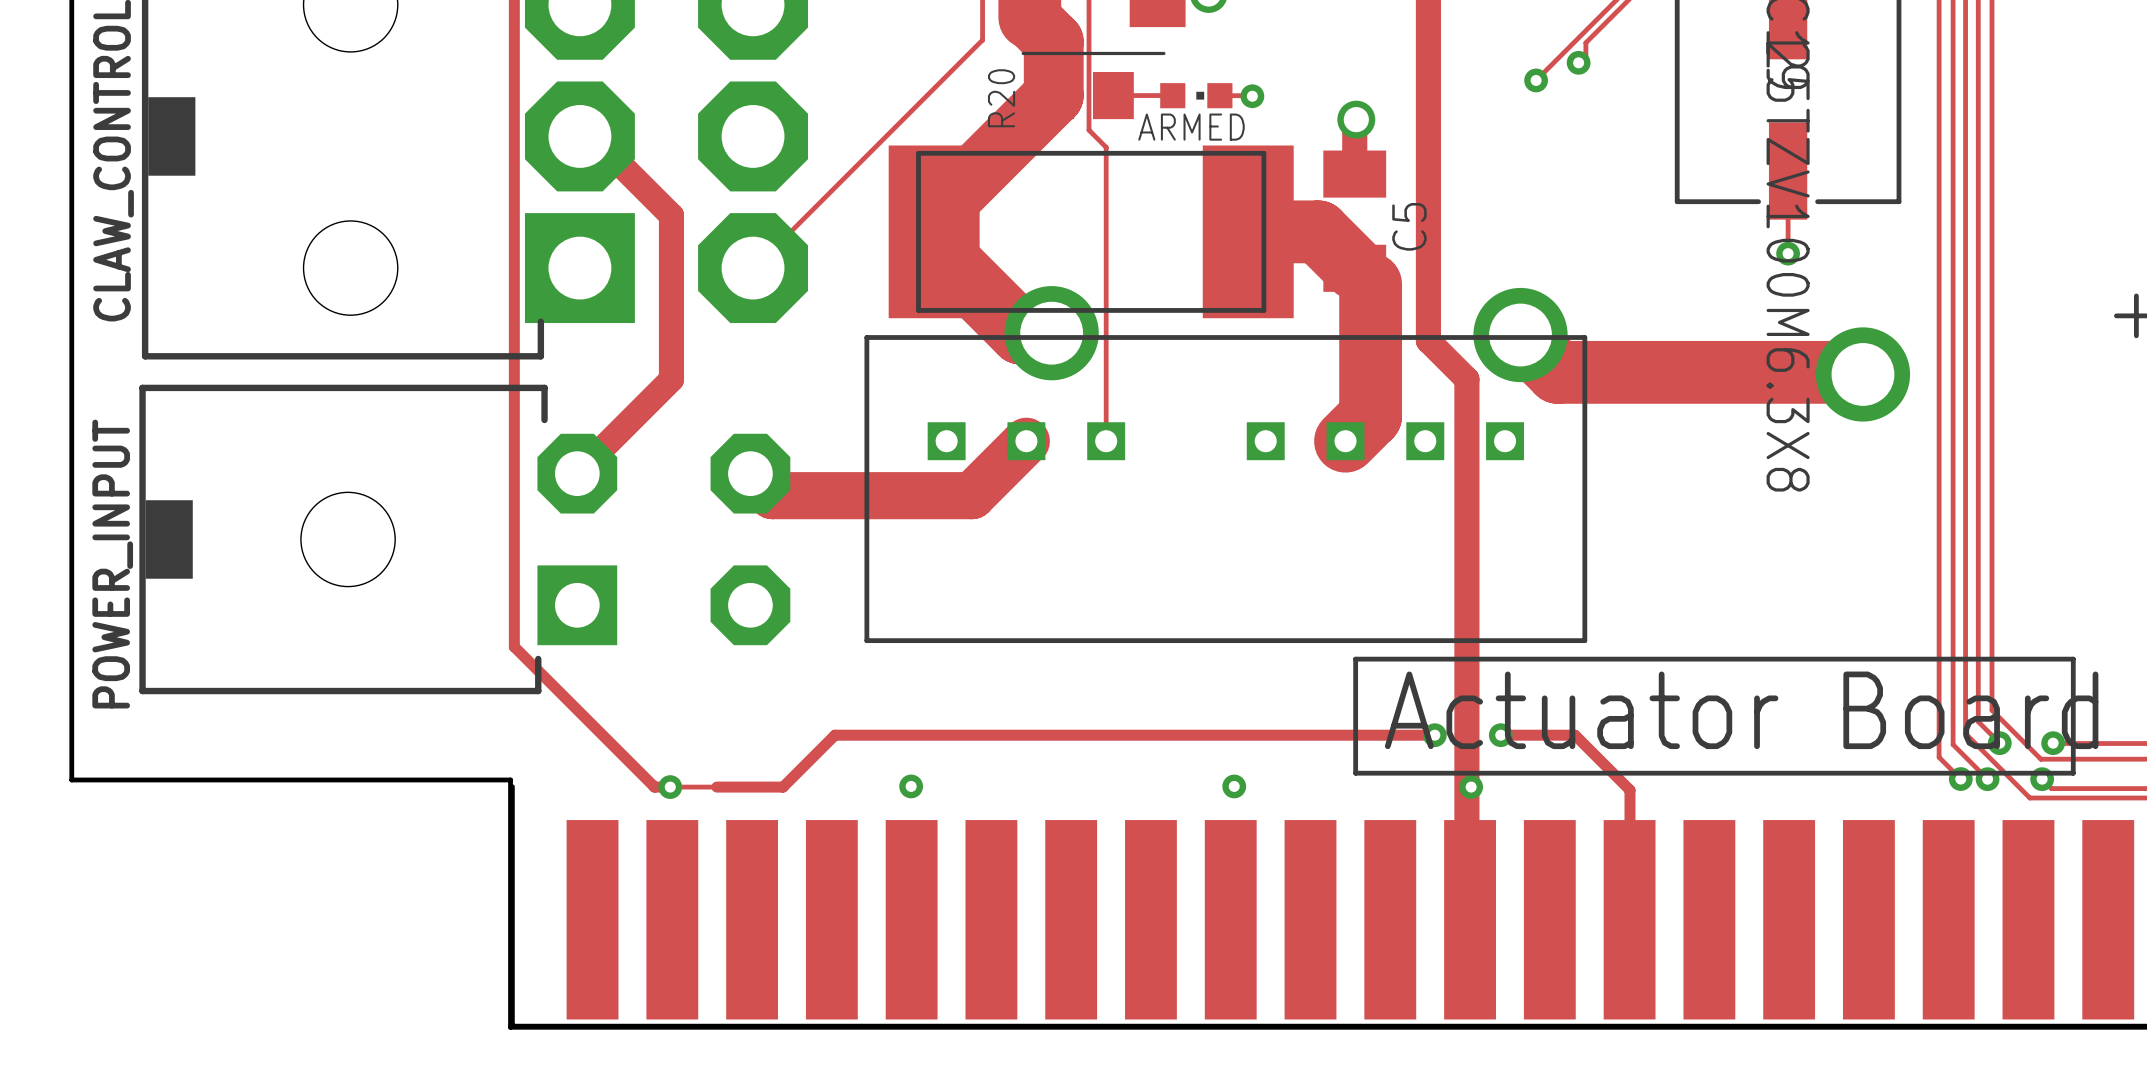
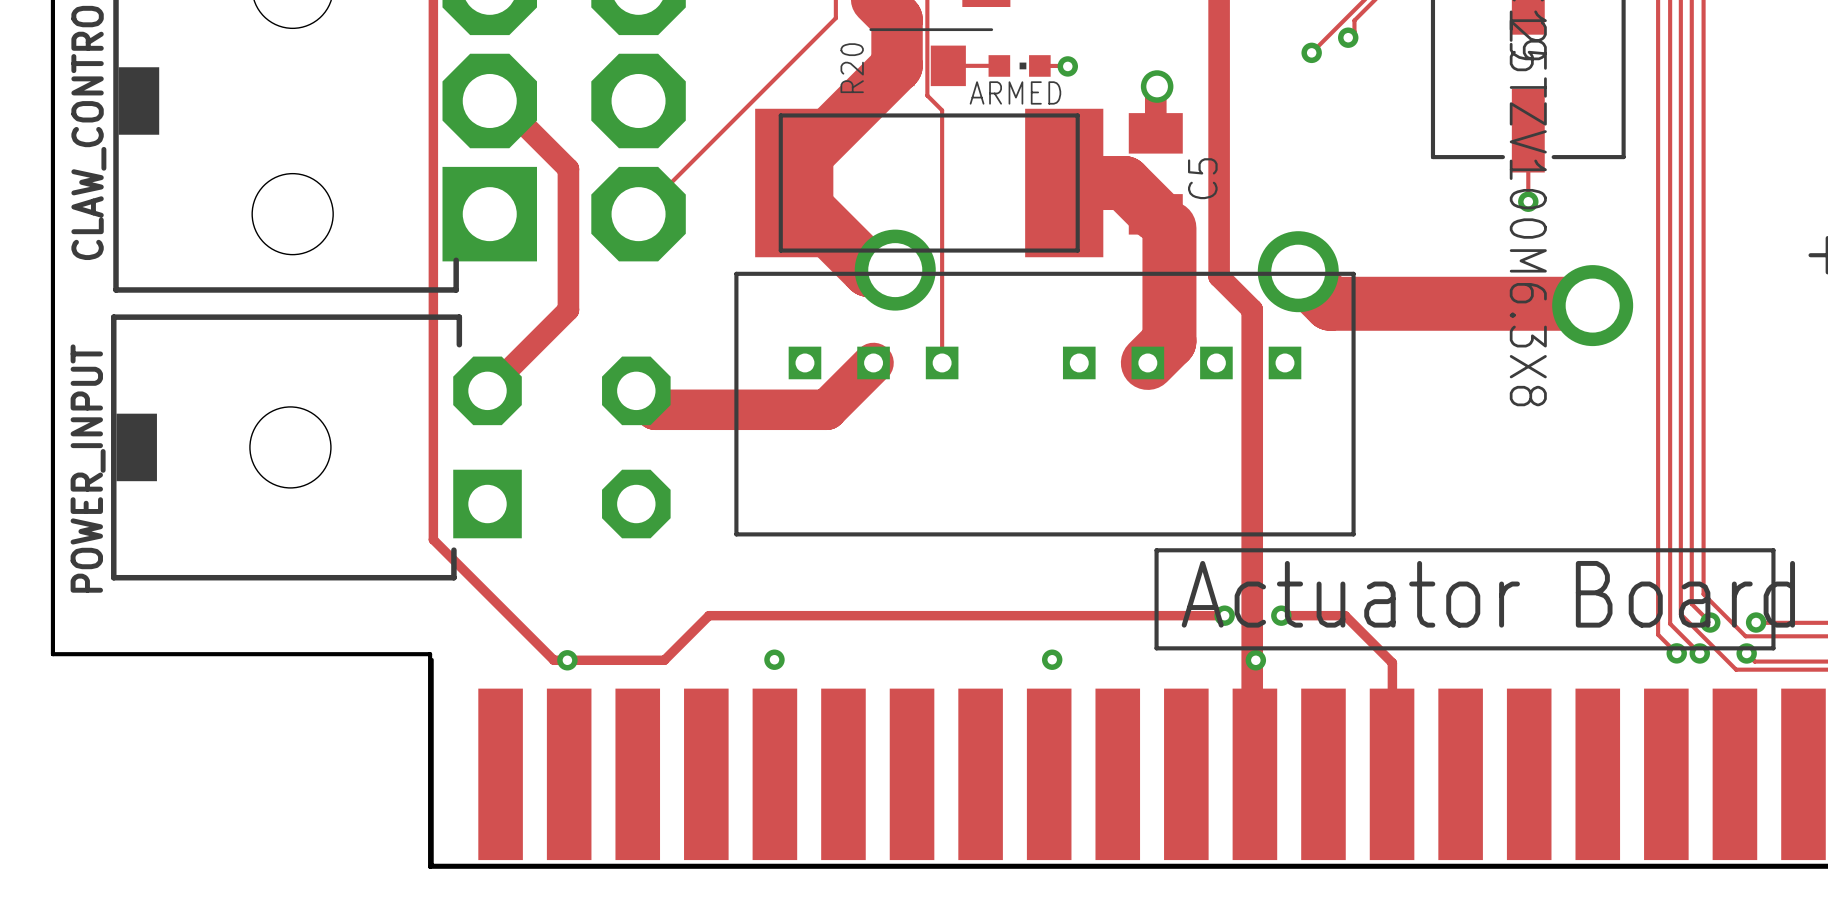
track width: thin (670, 787) (716, 787) -> thick (567, 660) (607, 660)

